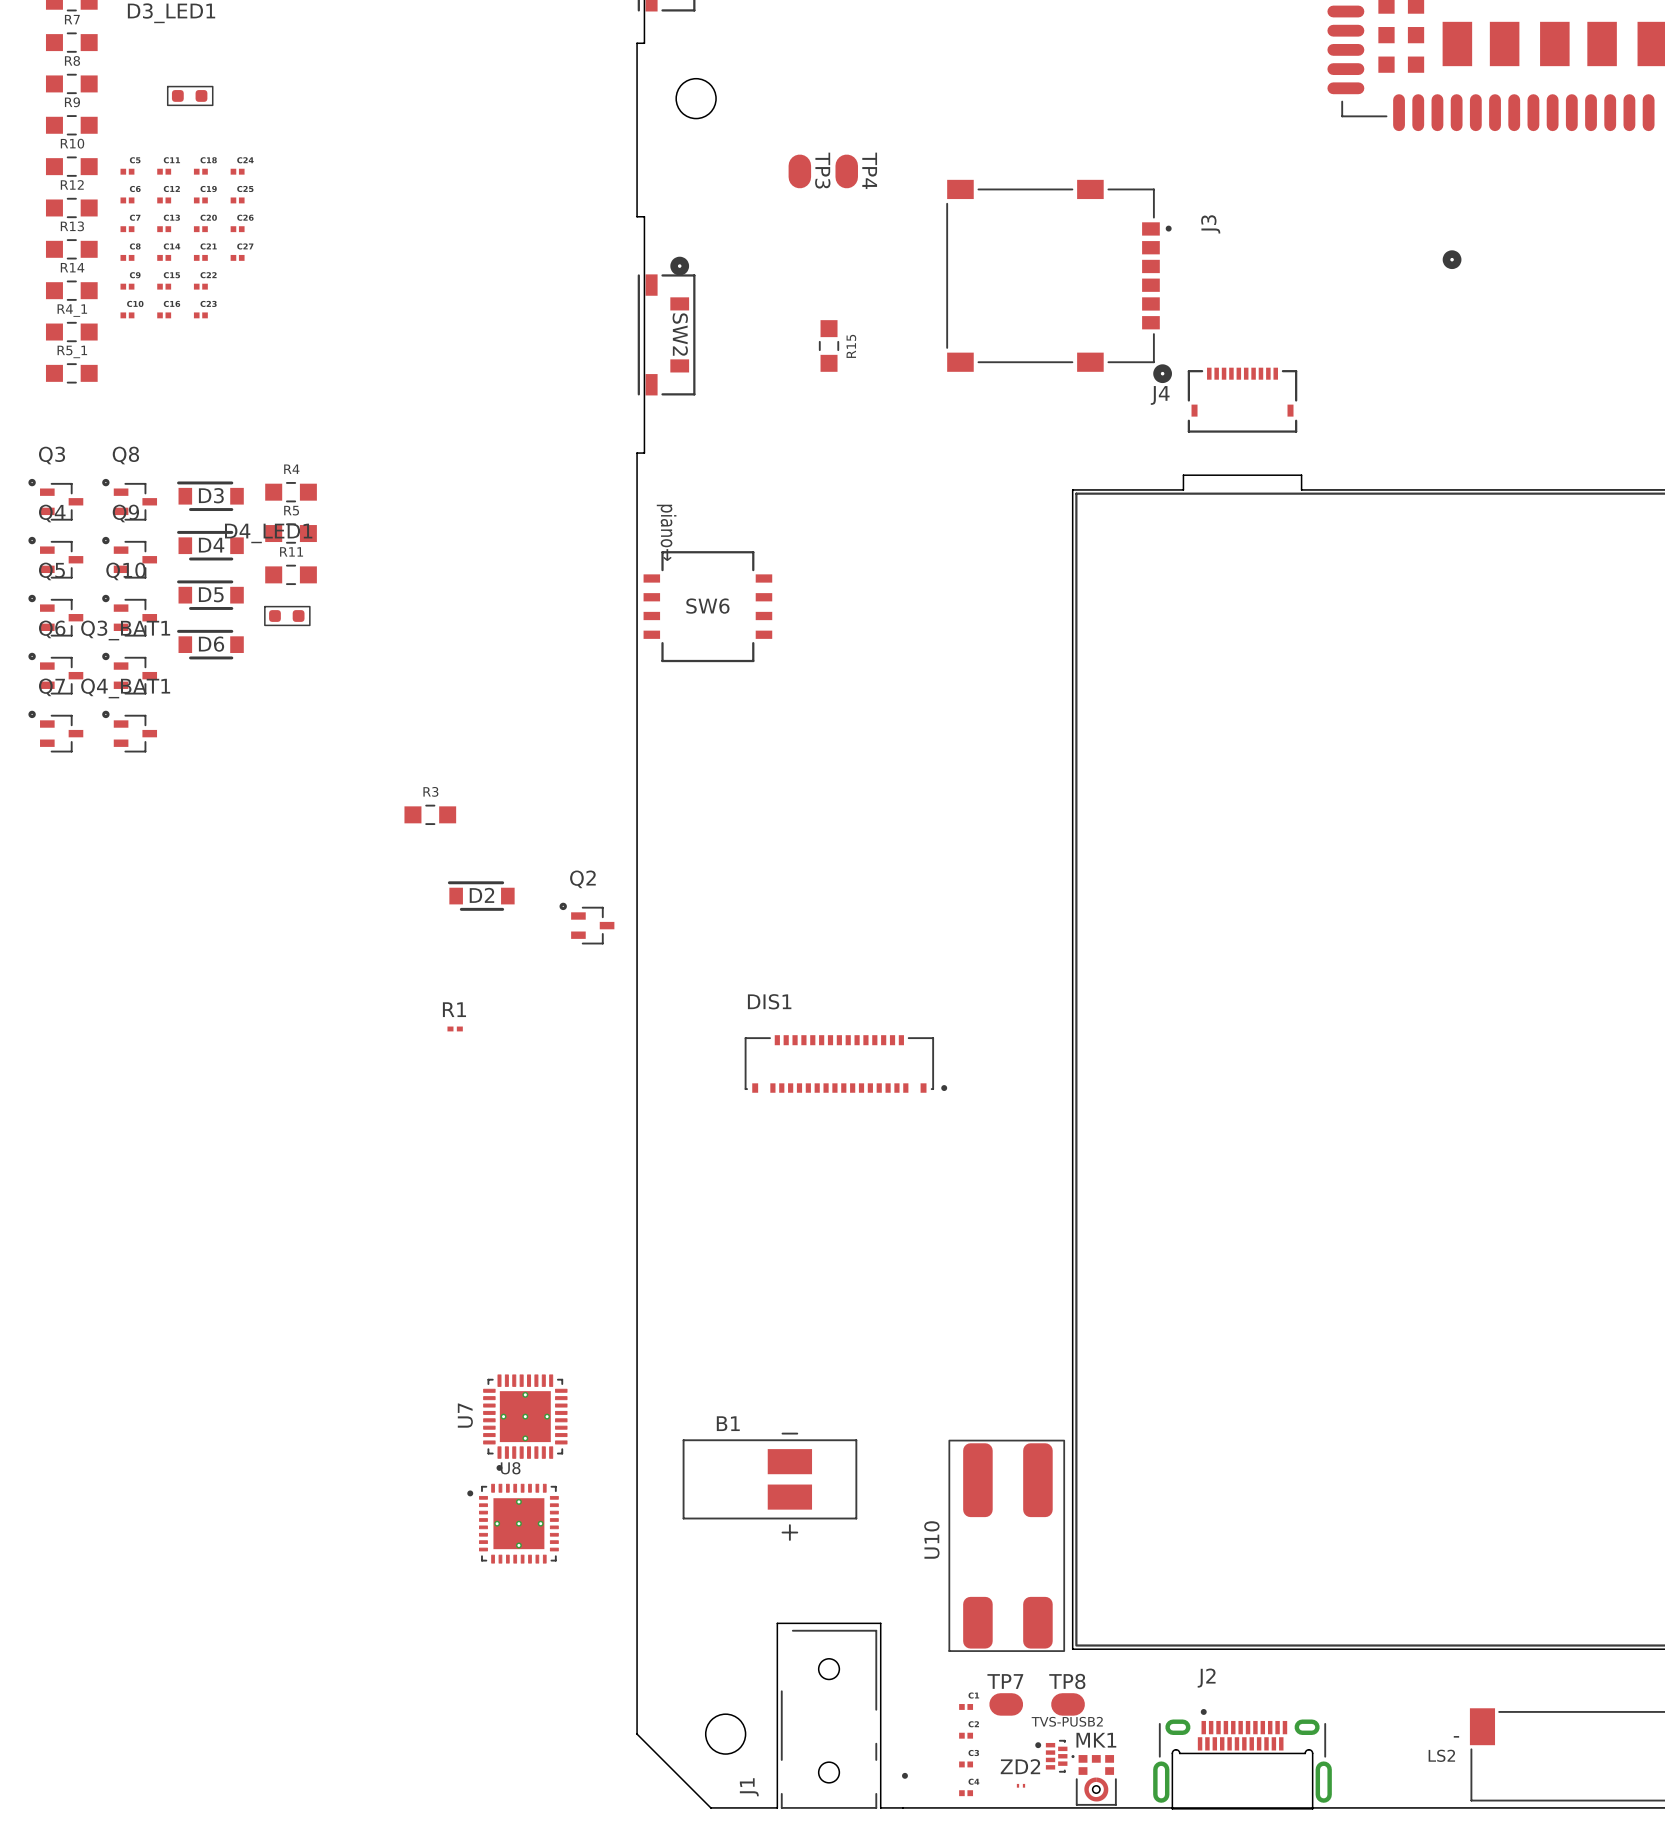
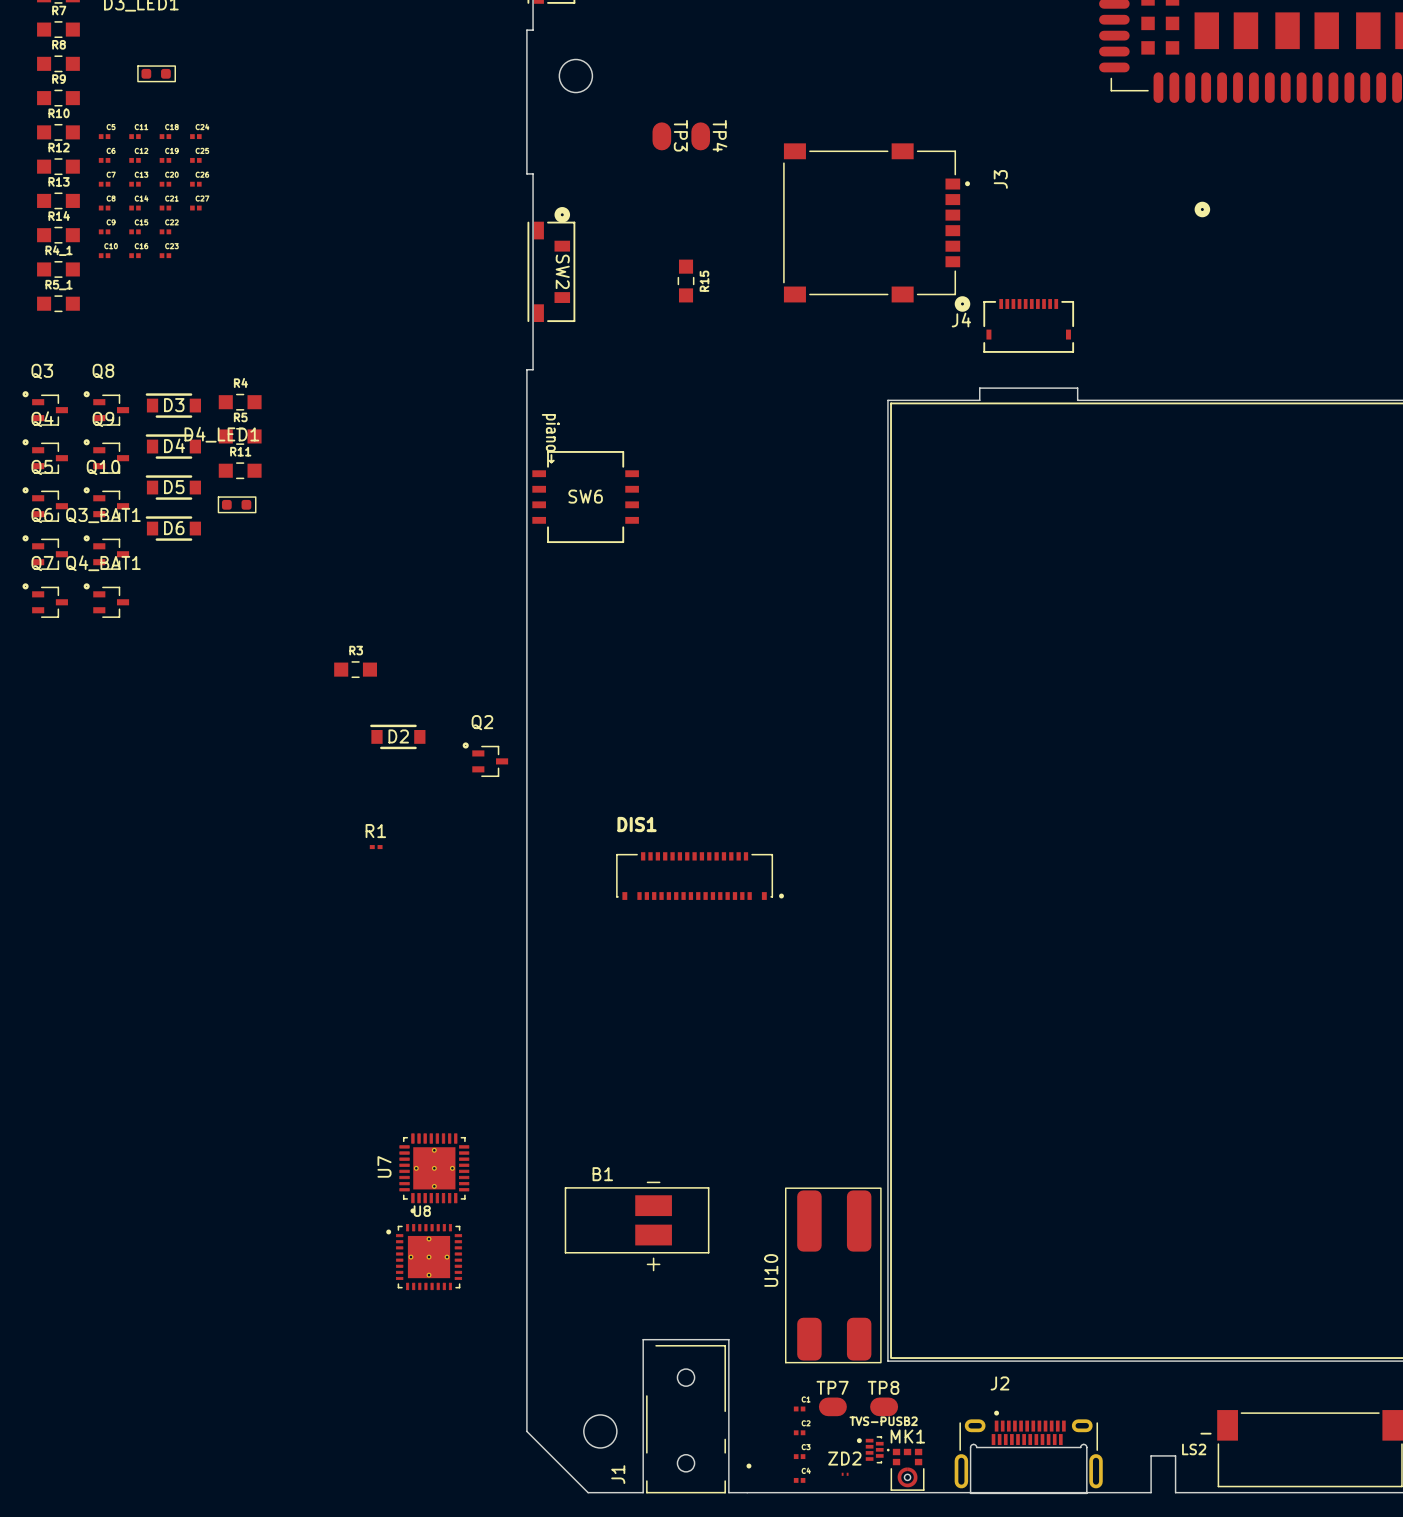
board edge: (1390, 1807) (1419, 1807) -> (1151, 1492) (1151, 1455) (1175, 1455) (1175, 1492)

